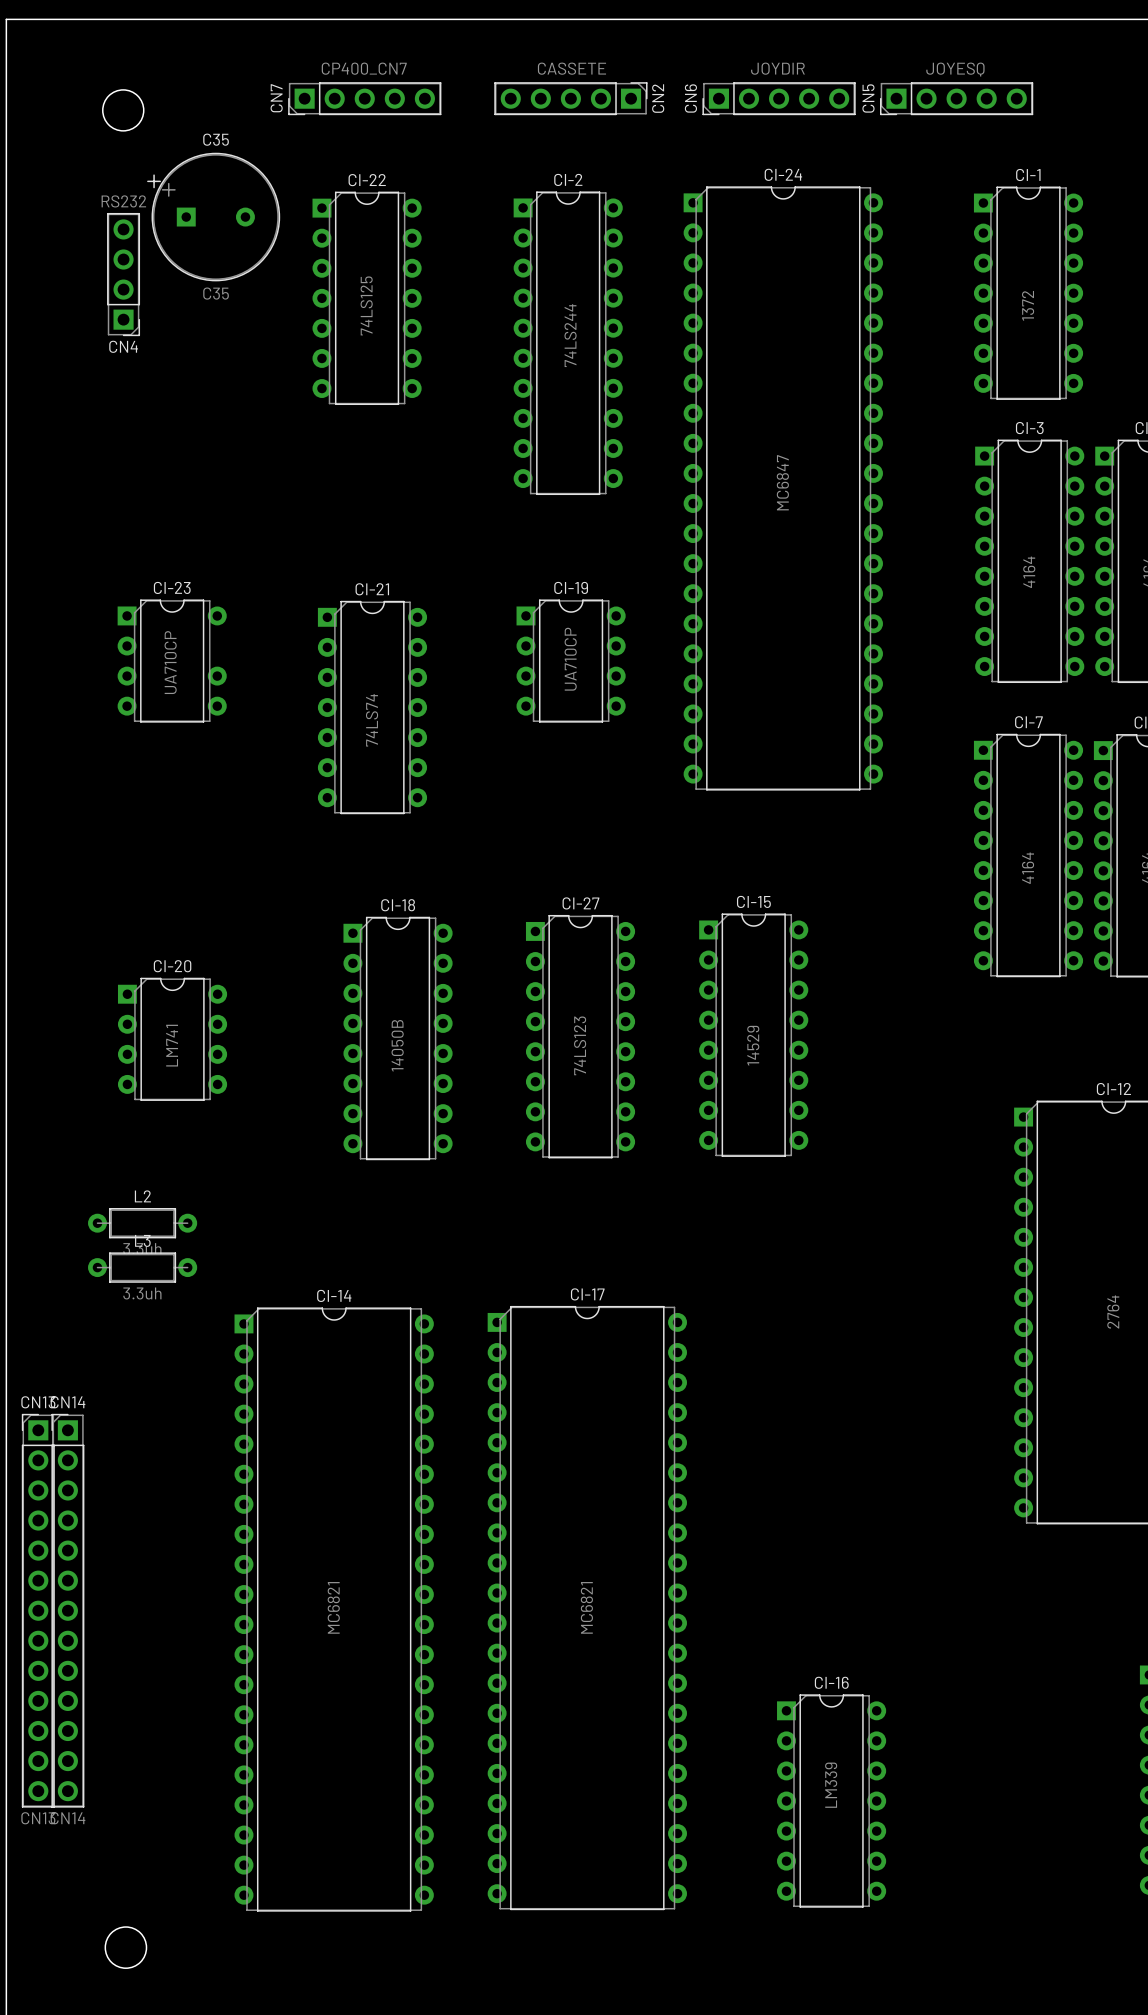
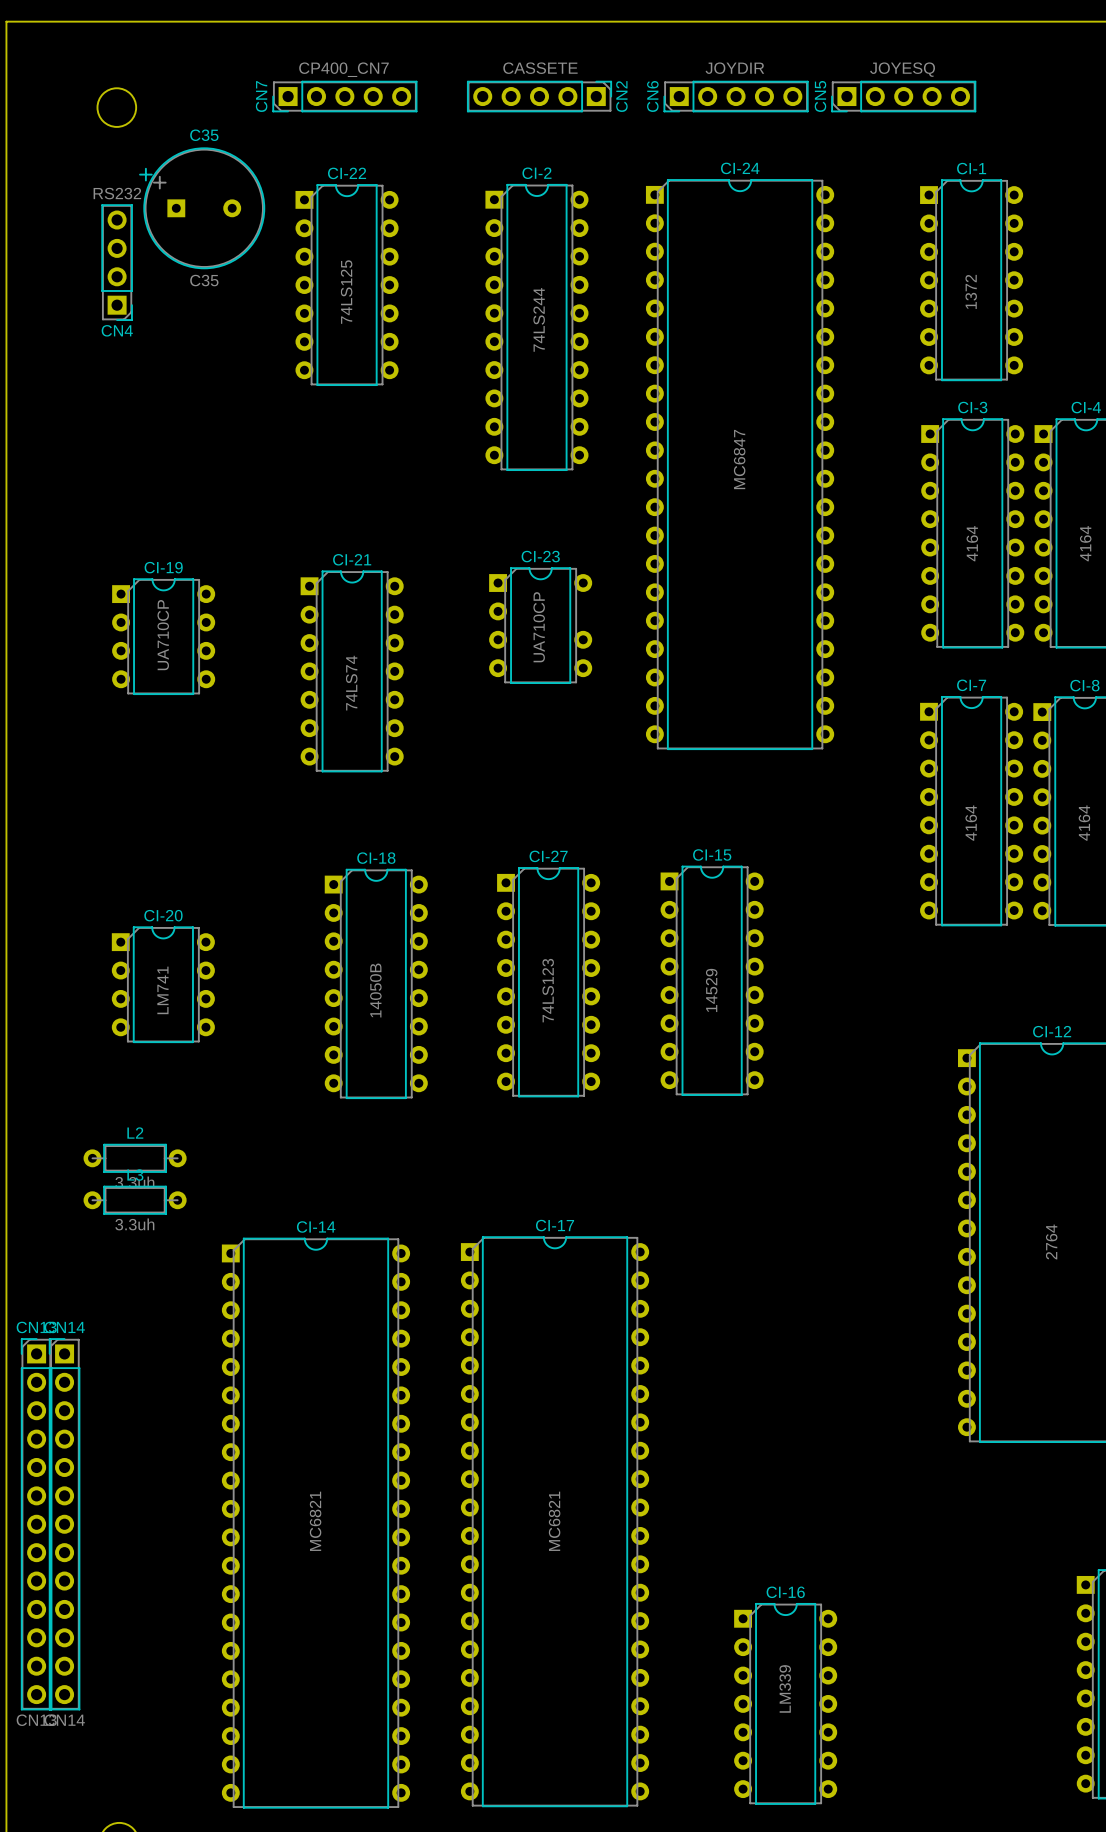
CI-23 position: (172, 661) -> (540, 625)
CI-19 position: (571, 661) -> (163, 636)

